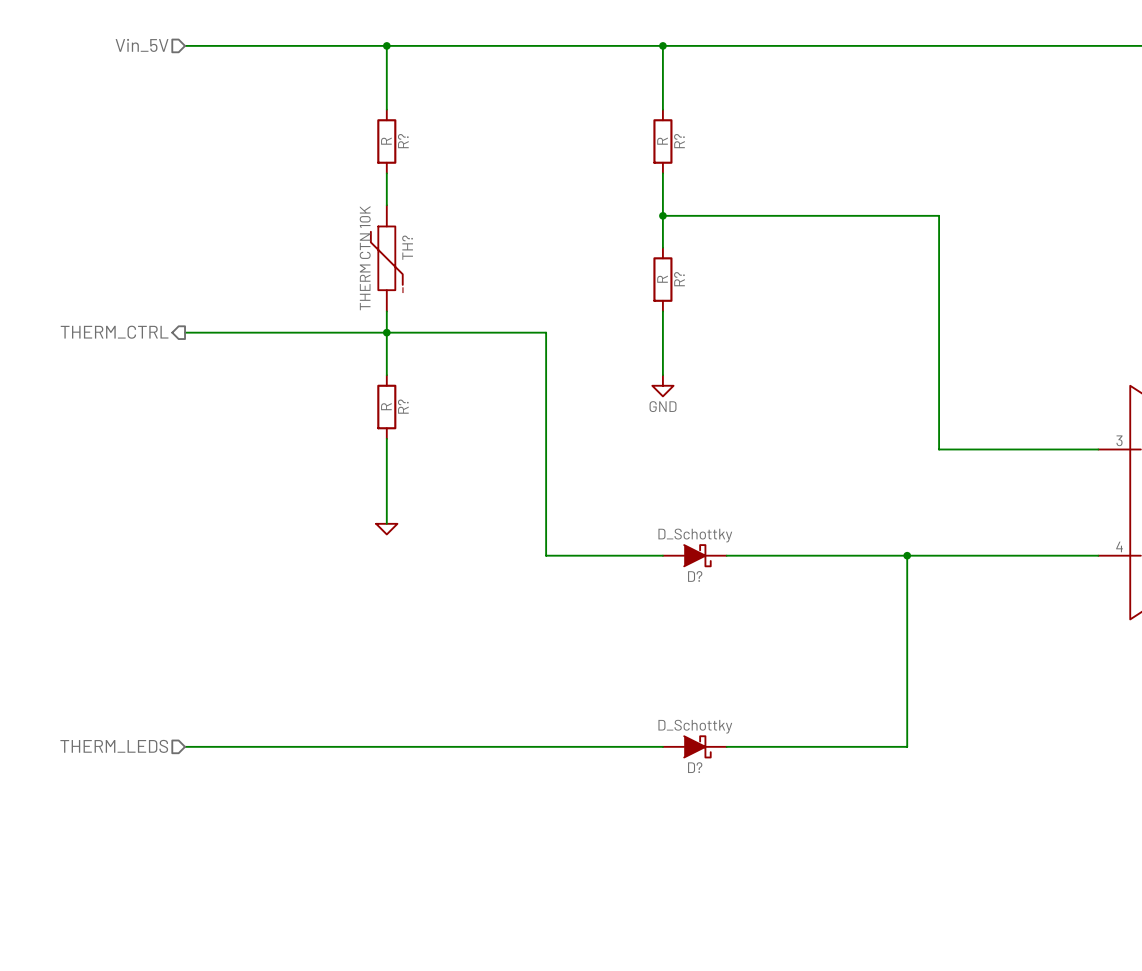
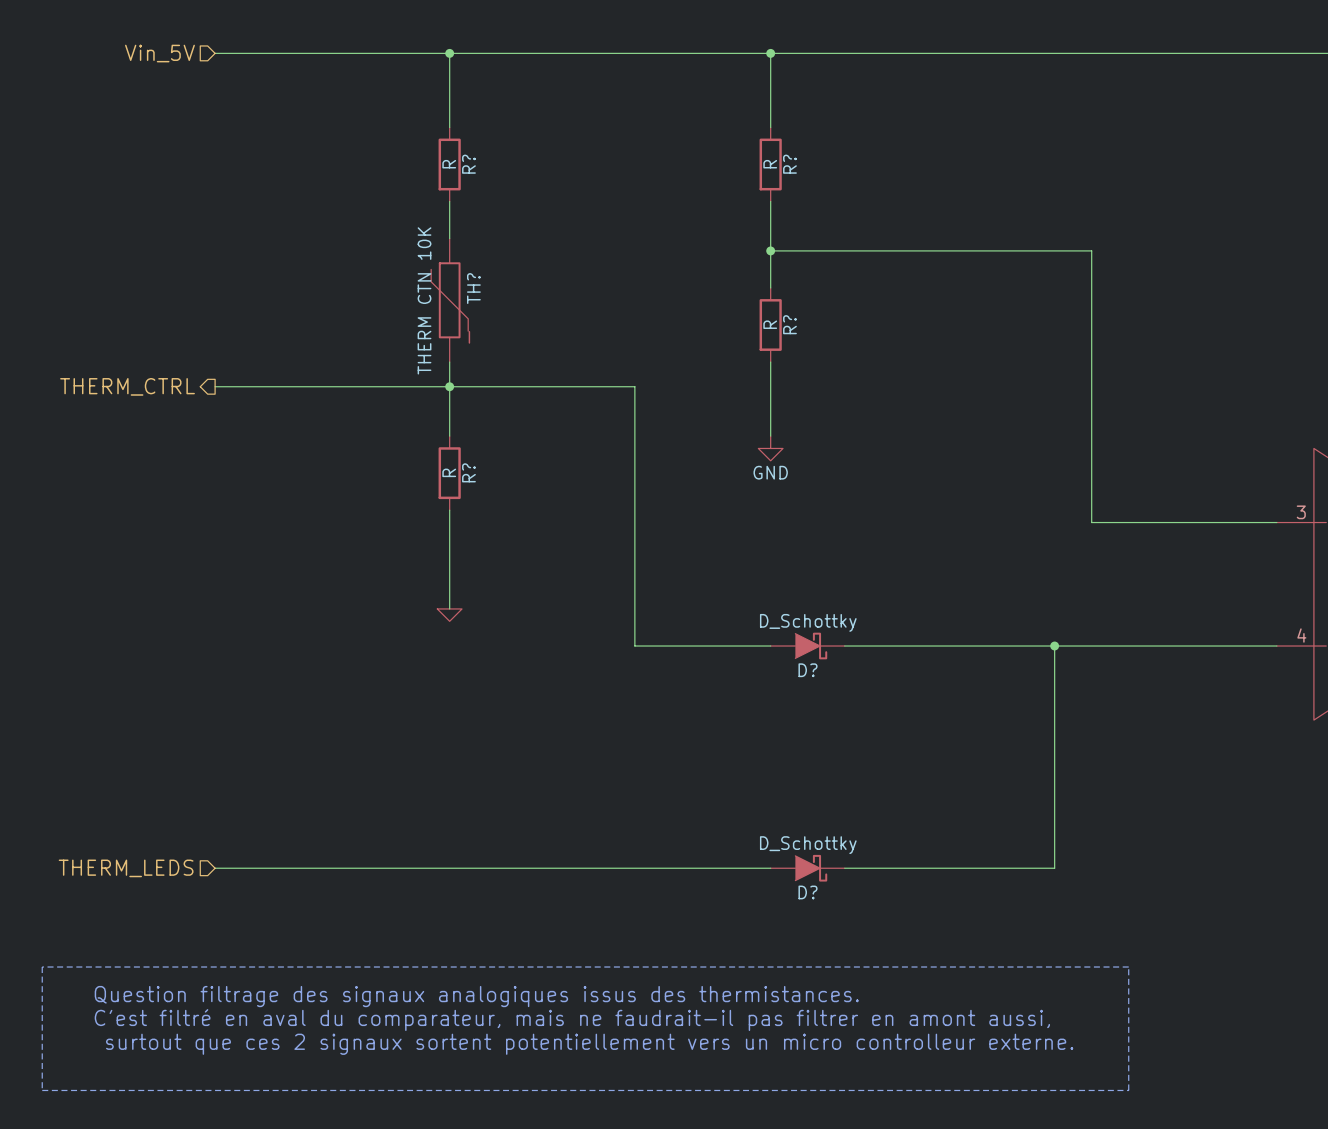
line: none -> (42, 967) (1128, 967) (1128, 1090) (42, 1090) (42, 967)
text: none -> Question filtrage des signaux analogiques issus des thermistances. (476, 996)
text: none -> C'est filtré en aval du comparateur, mais ne faudrait-il pas filtrer en amont aussi, (572, 1020)
text: none -> surtout que ces 2 signaux sortent potentiellement vers un micro controlleur externe. (589, 1044)

